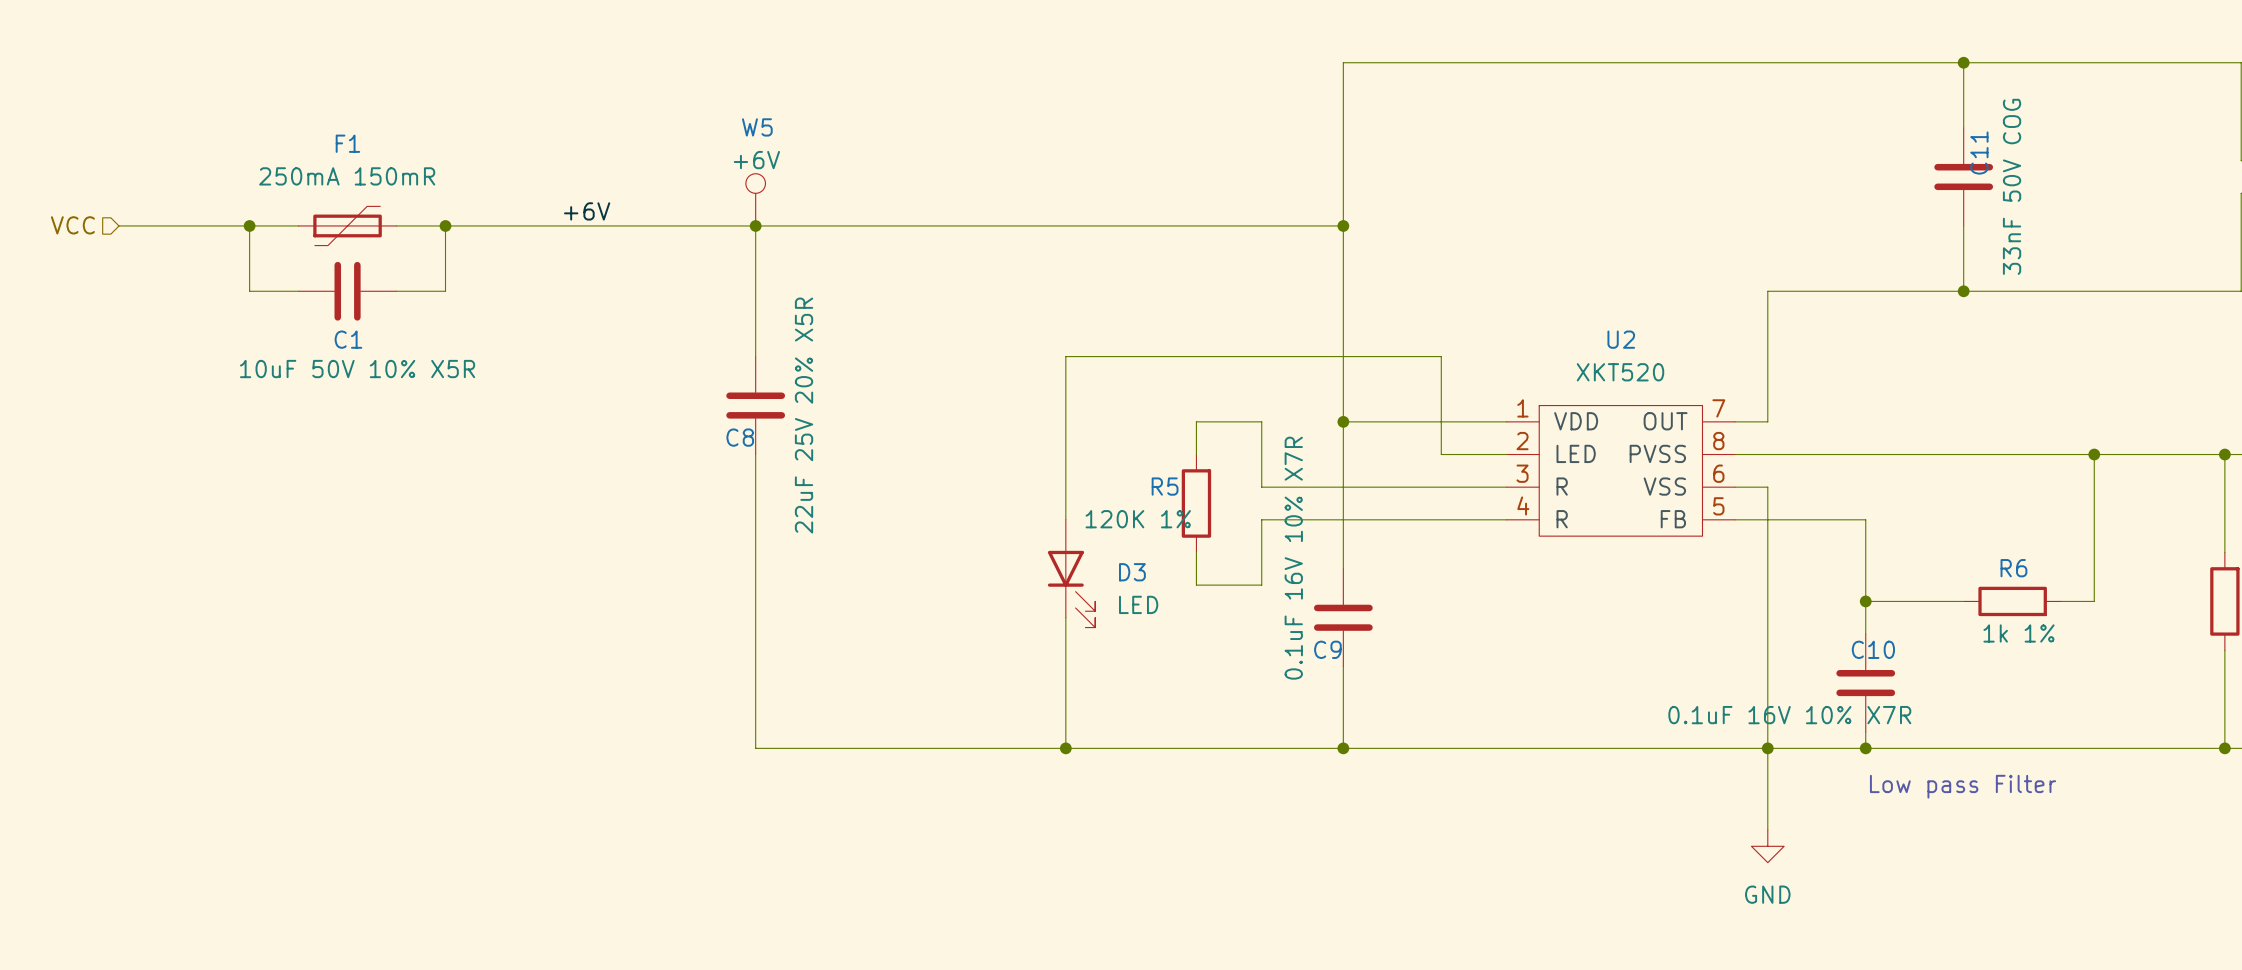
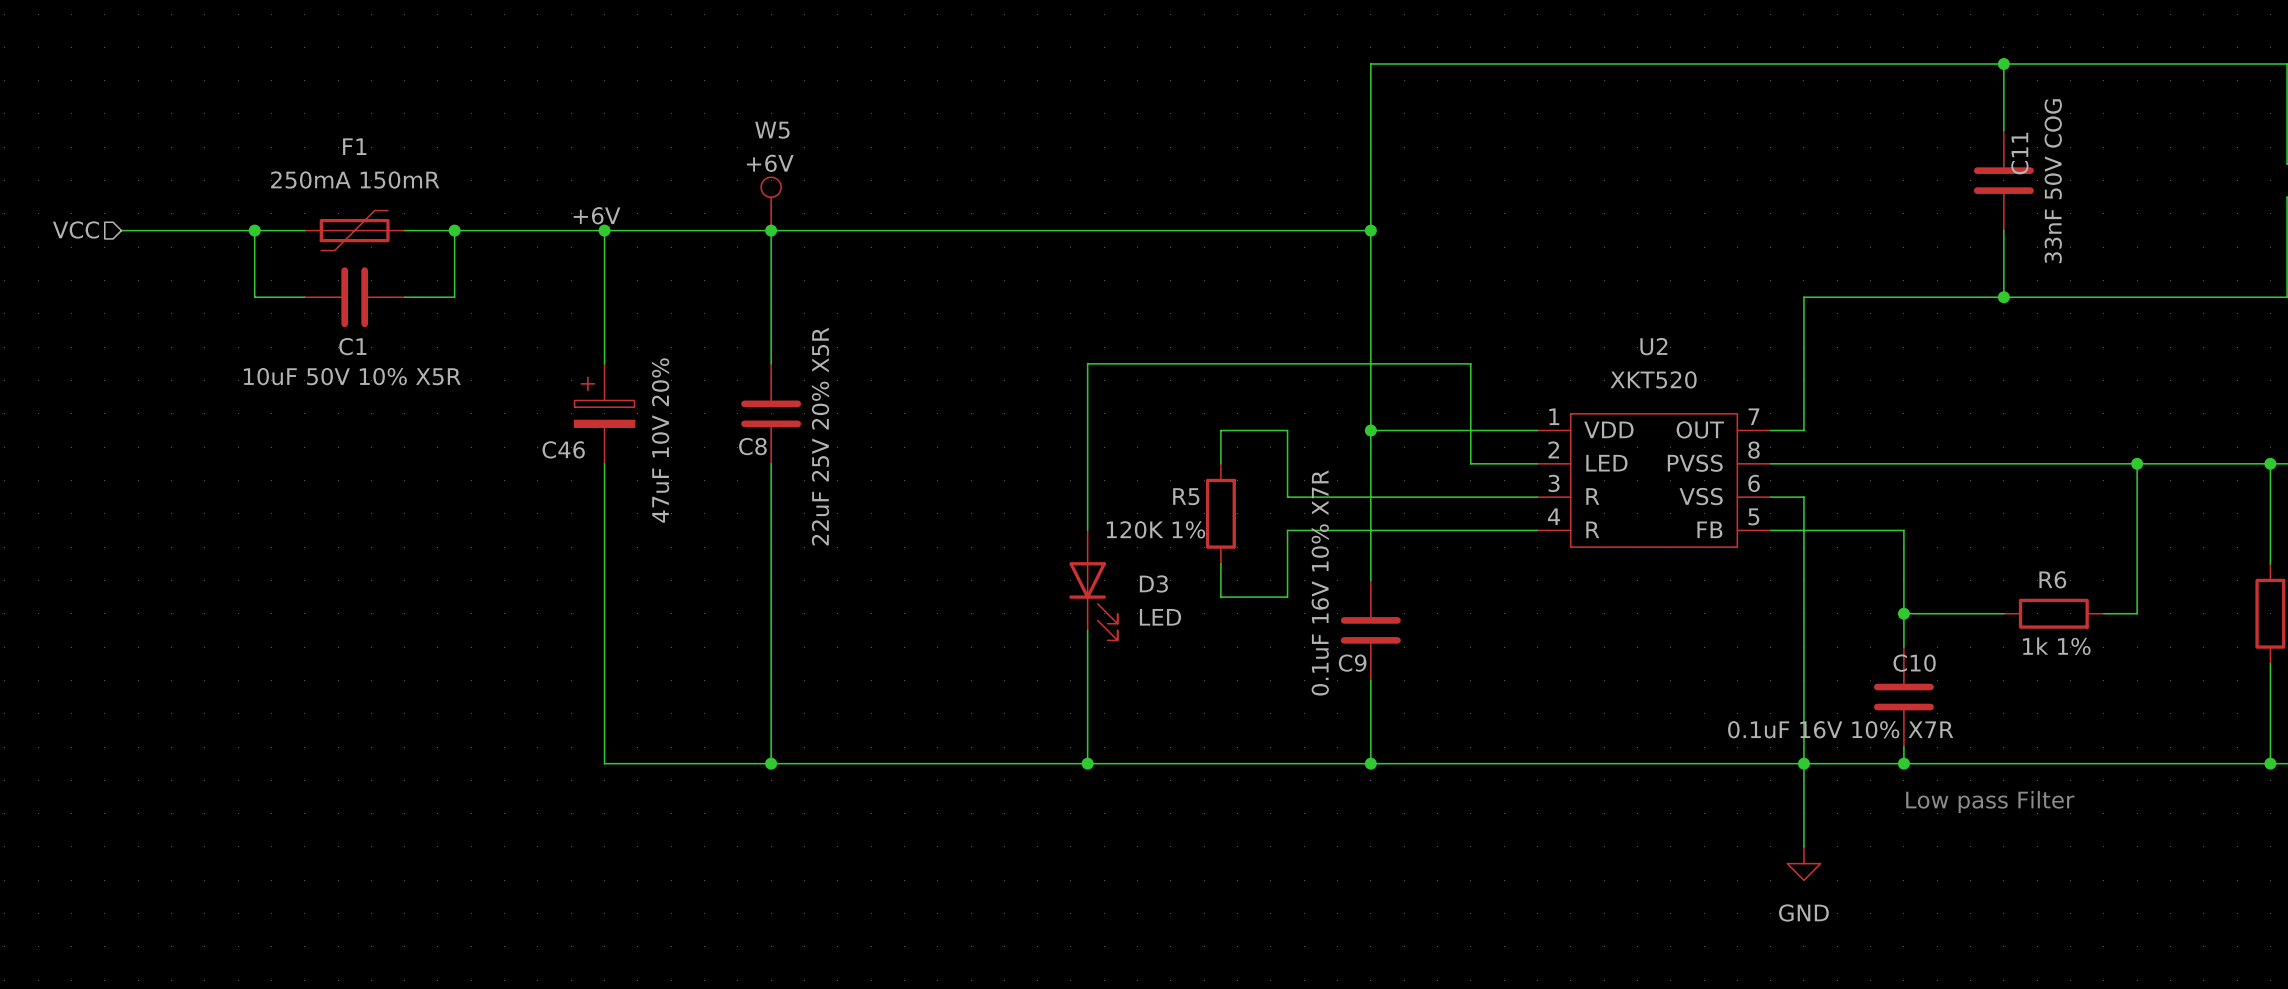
wire: none -> (604, 230) (604, 363)
junction: none -> (604, 230)
C46: none -> 47uF 10V 20% (604, 413)
wire: none -> (604, 463) (604, 763) (771, 763)
junction: none -> (771, 763)

